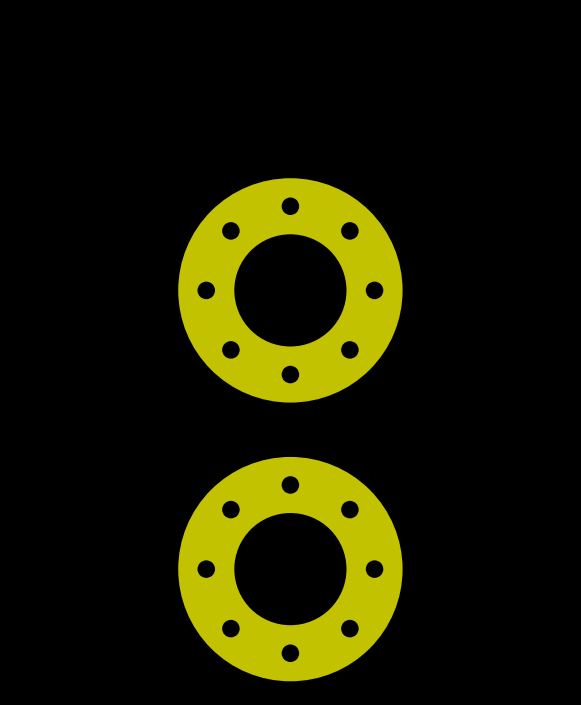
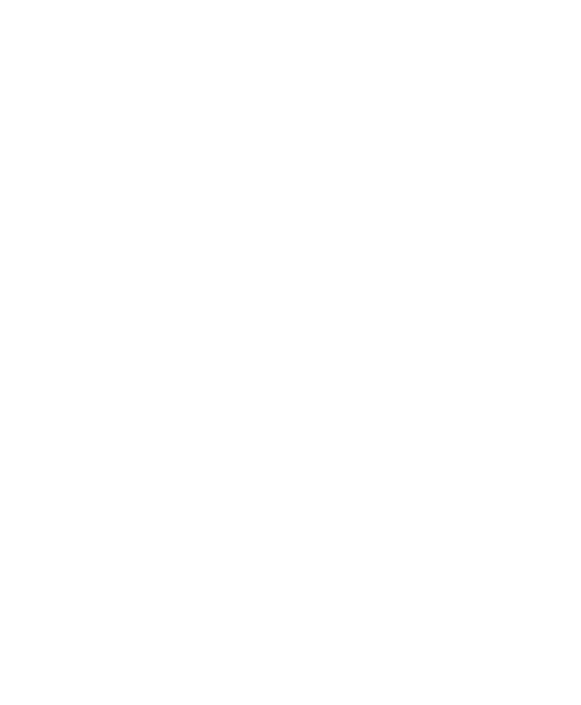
part: (290, 290) -> none
part: (290, 569) -> none

